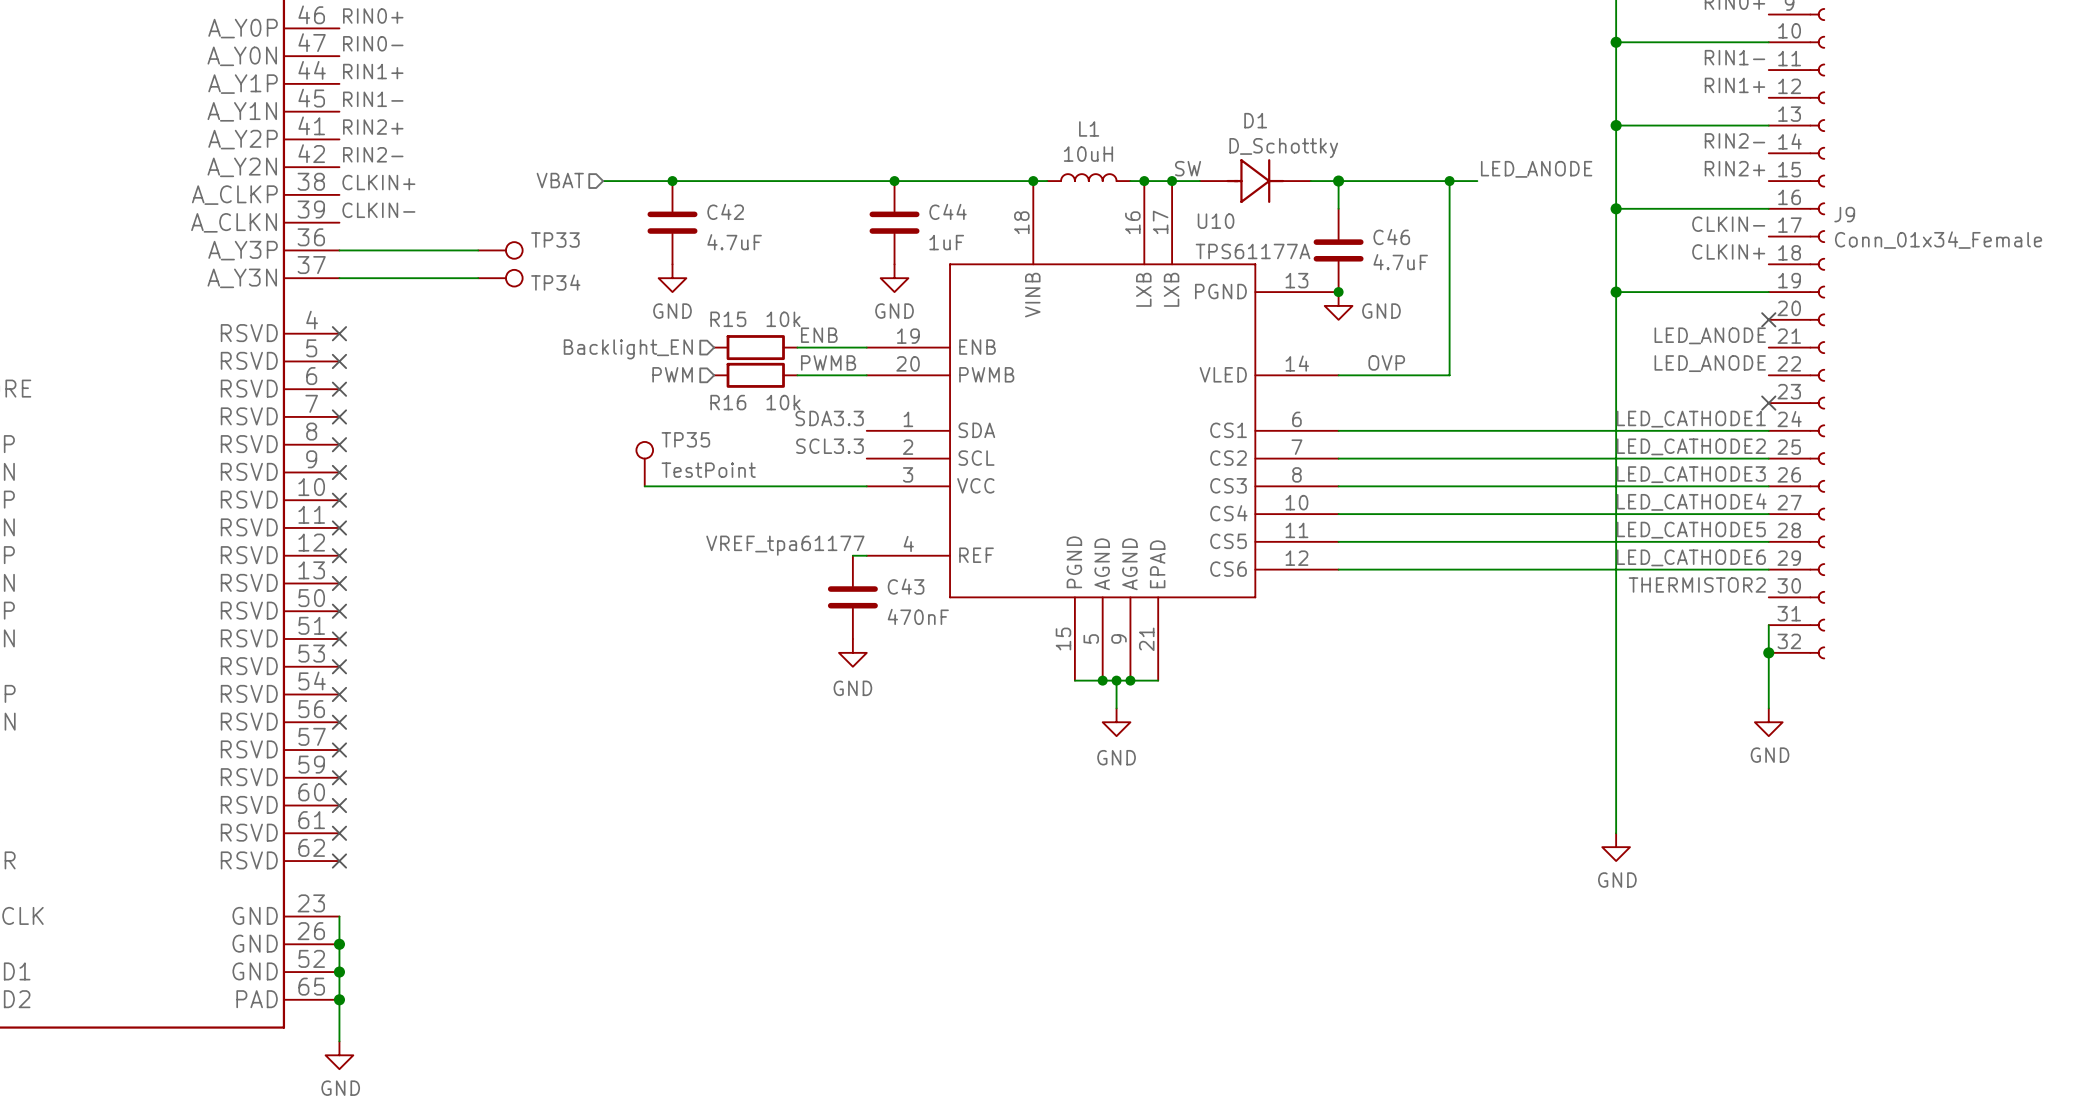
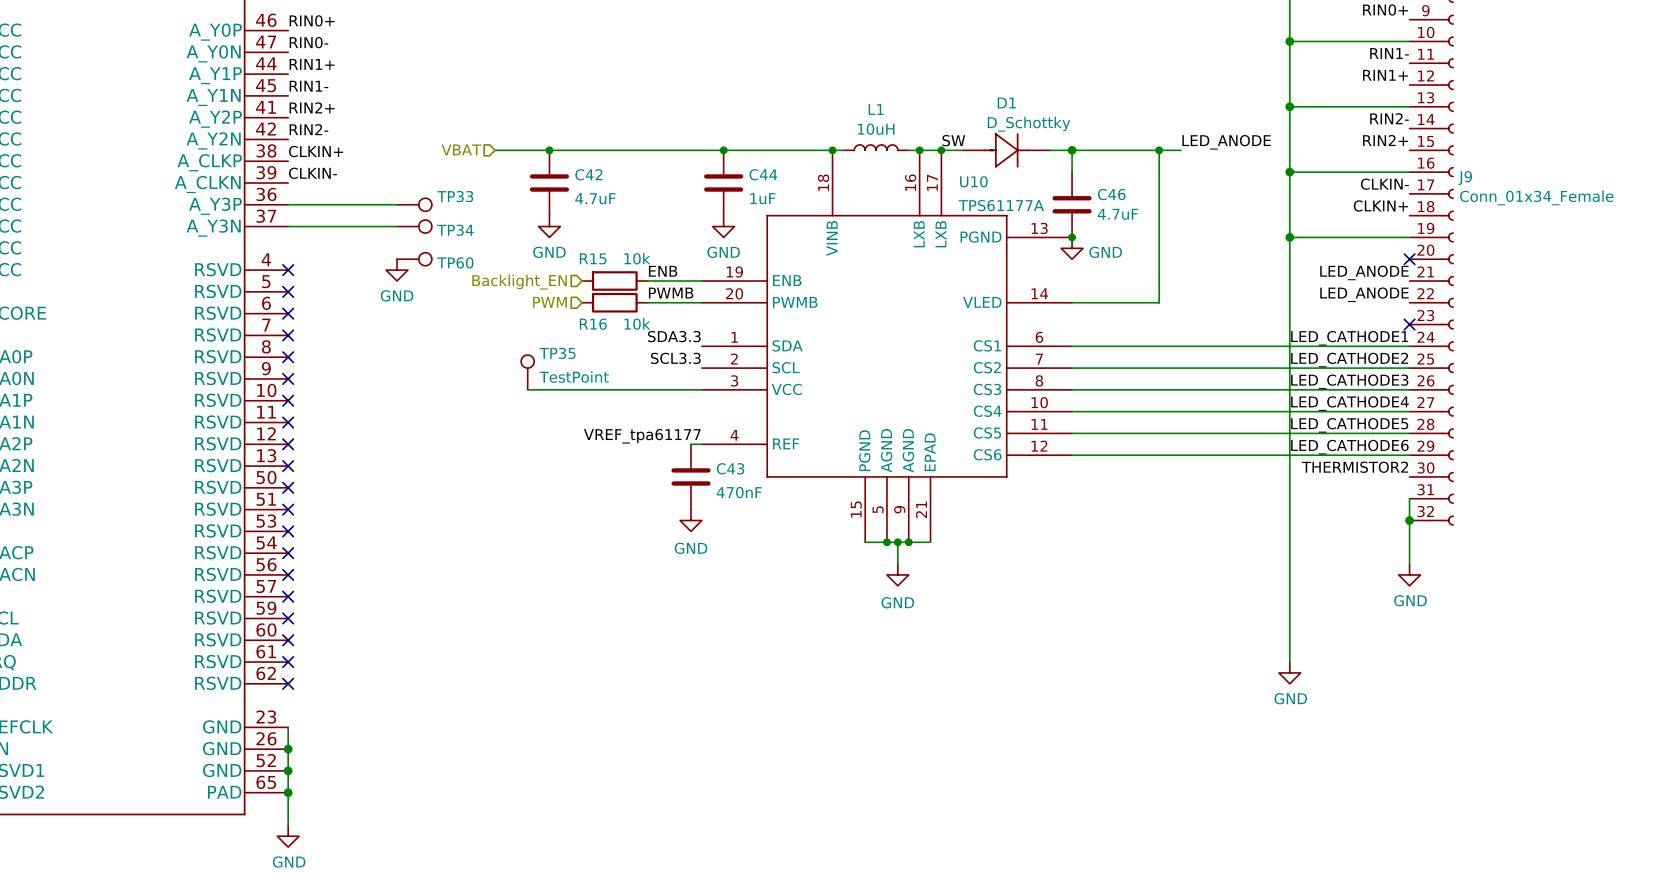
TP60: none -> (414, 259)
power symbol: none -> GND (397, 270)
label: OVP (1386, 362) -> none

